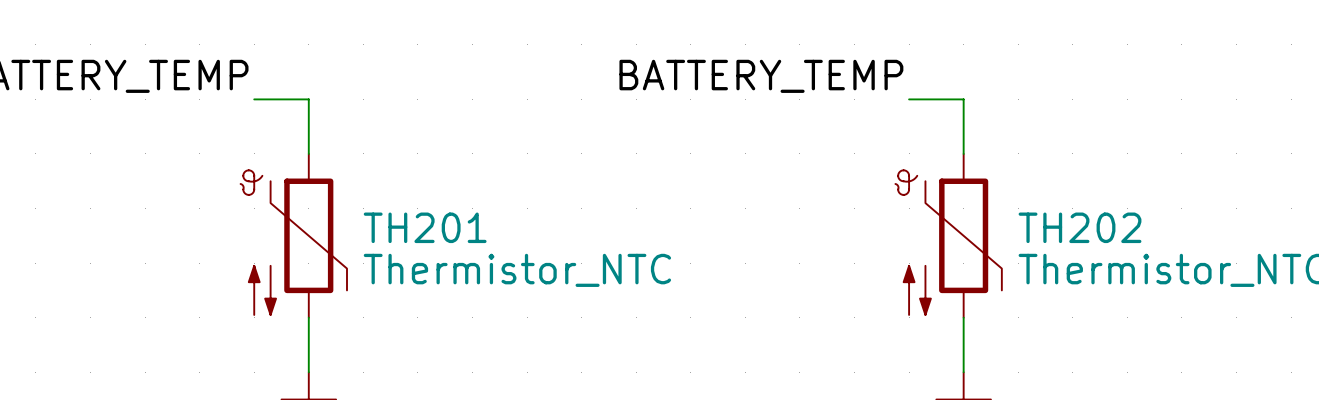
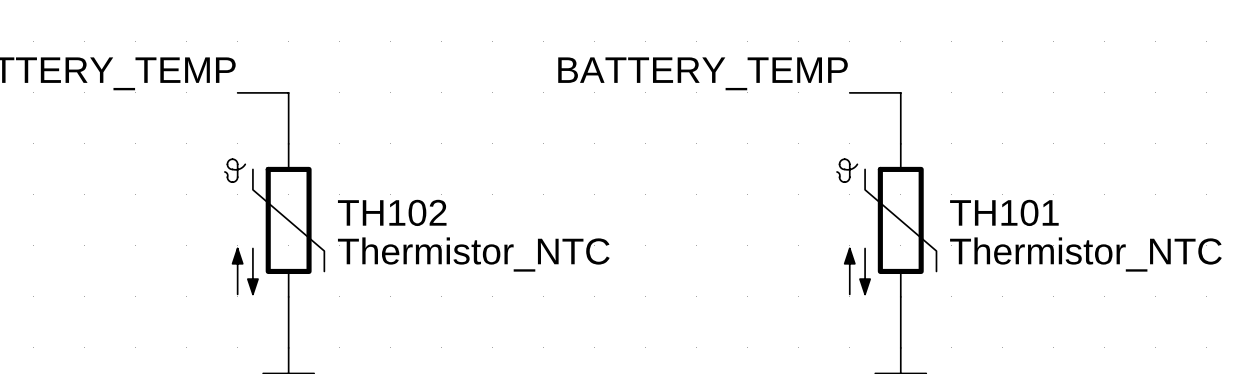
TH201 name: TH201 (425, 227) -> TH102 (392, 212)
TH202 name: TH202 (1080, 227) -> TH101 (1004, 212)

